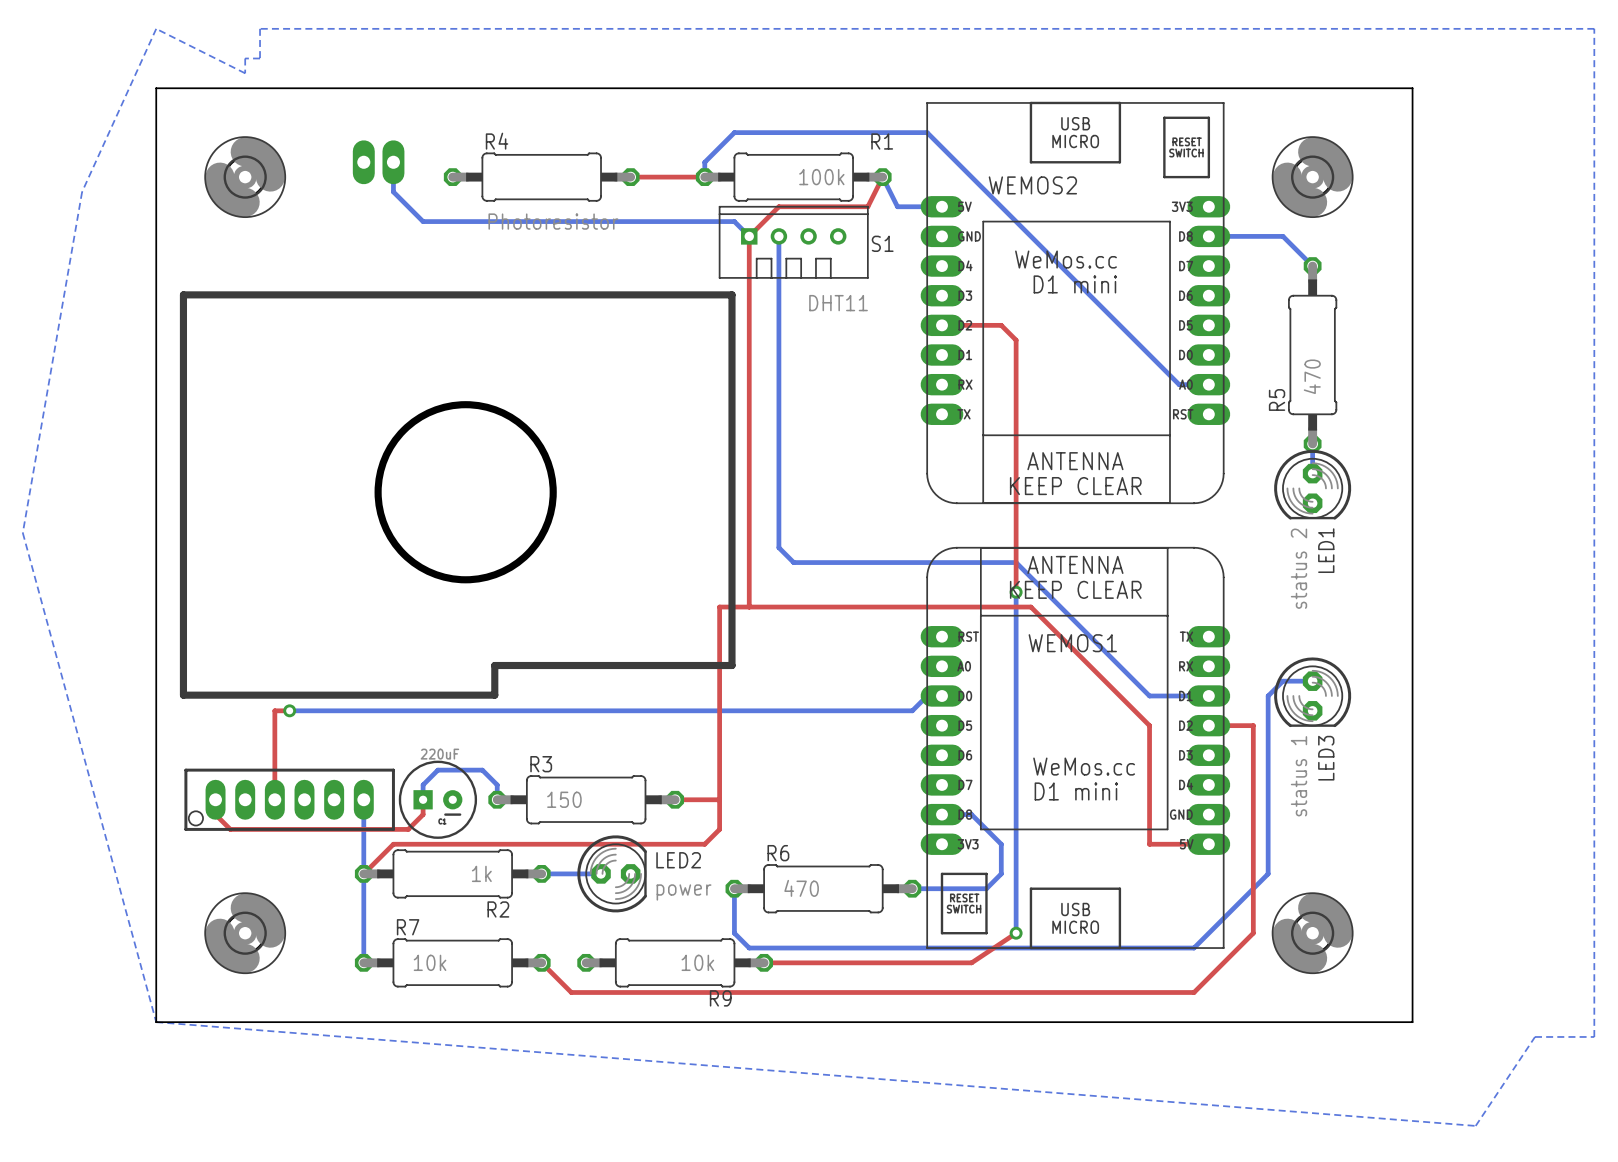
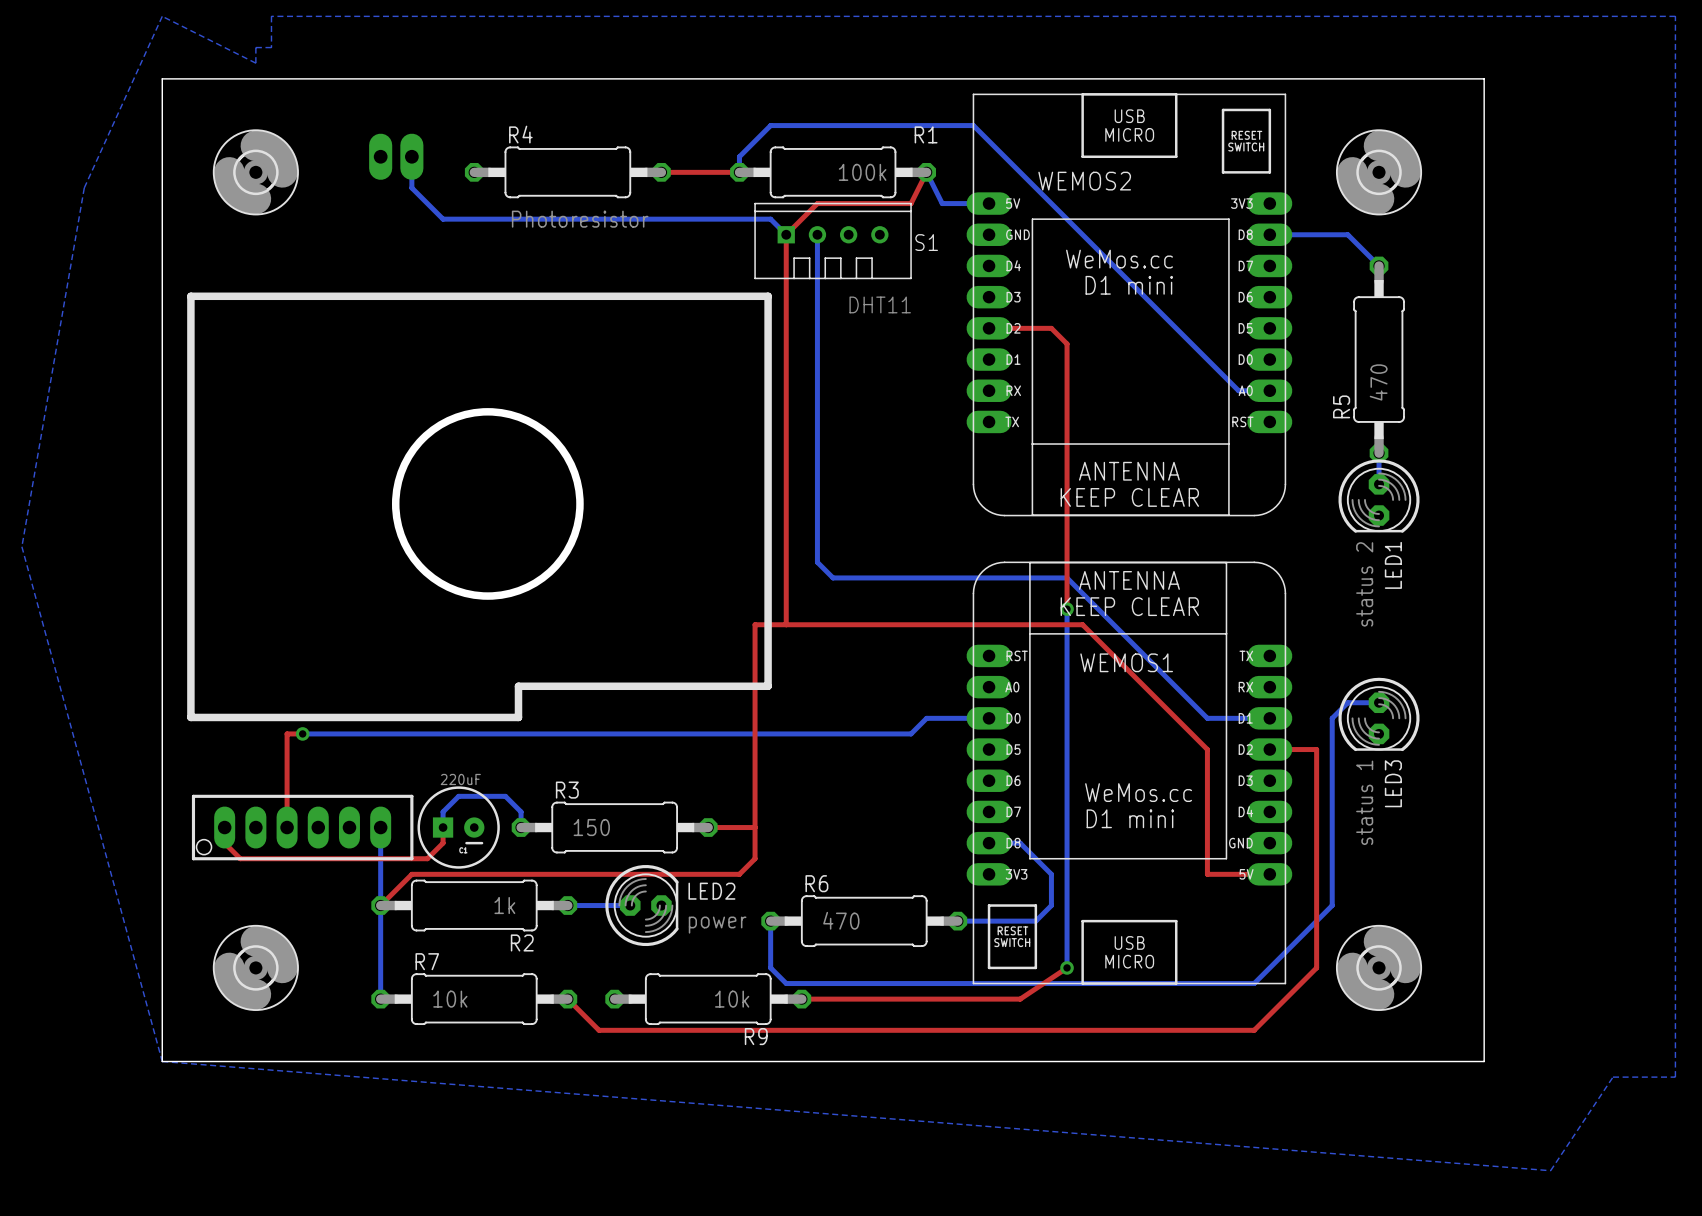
bottom track: (927, 695) (912, 710) (867, 710) -> (973, 718) (926, 718) (911, 733)

